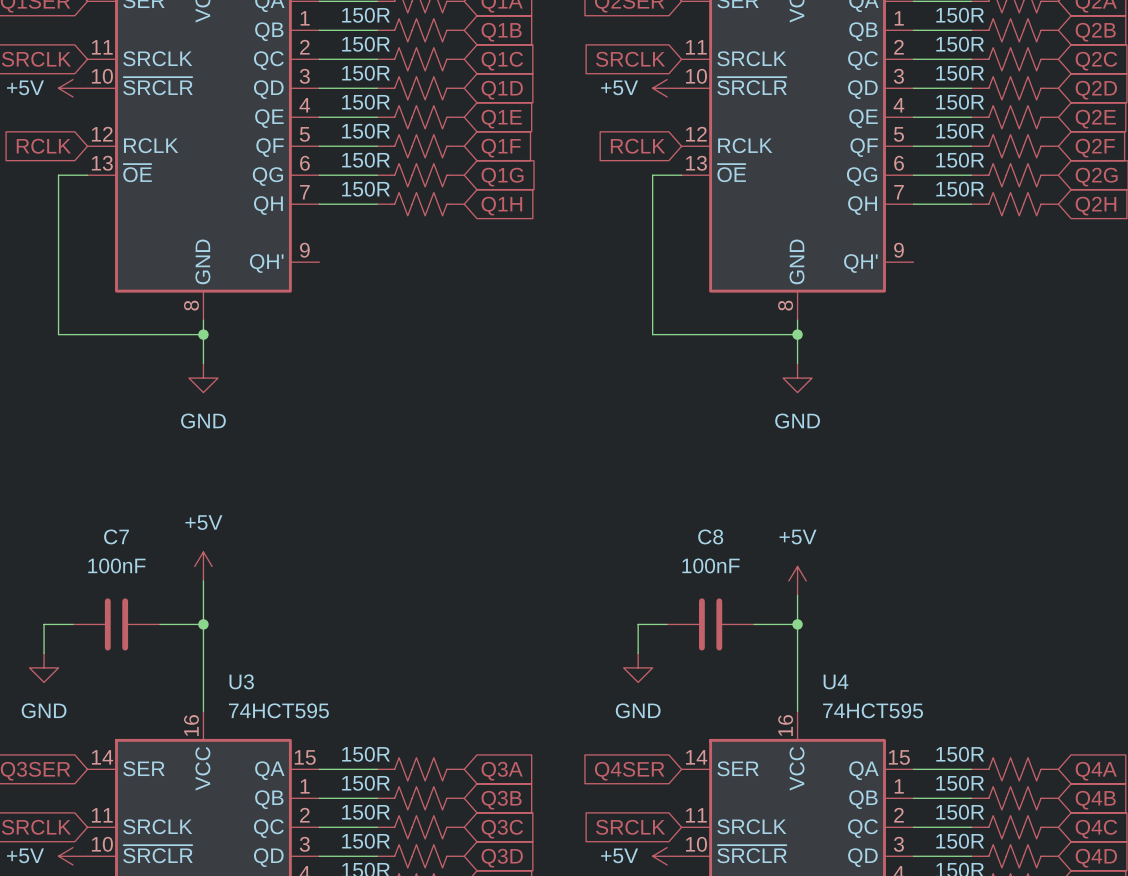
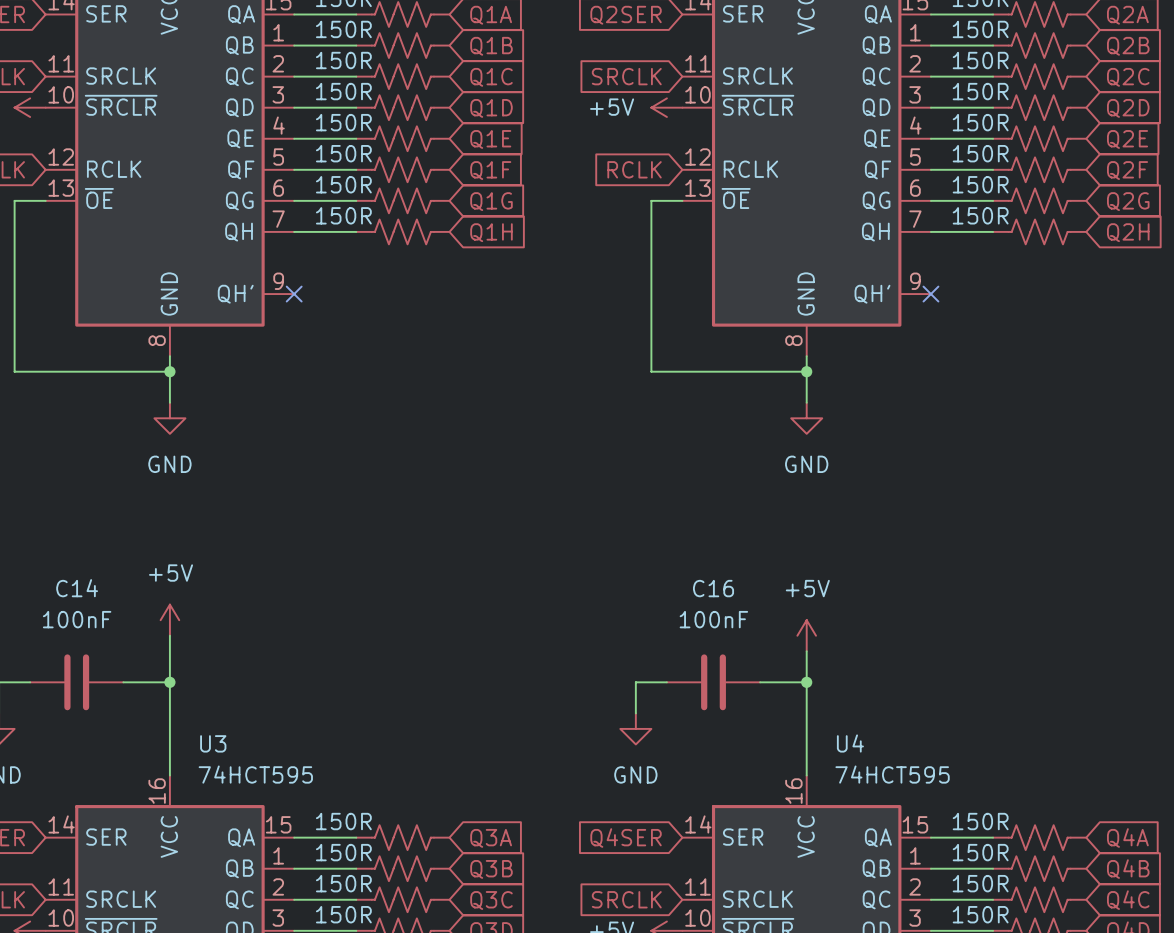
no-connect mark: none -> (294, 294)
no-connect mark: none -> (930, 294)
C7 name: C7 (116, 536) -> C14 (77, 588)
C8 name: C8 (710, 536) -> C16 (713, 588)

